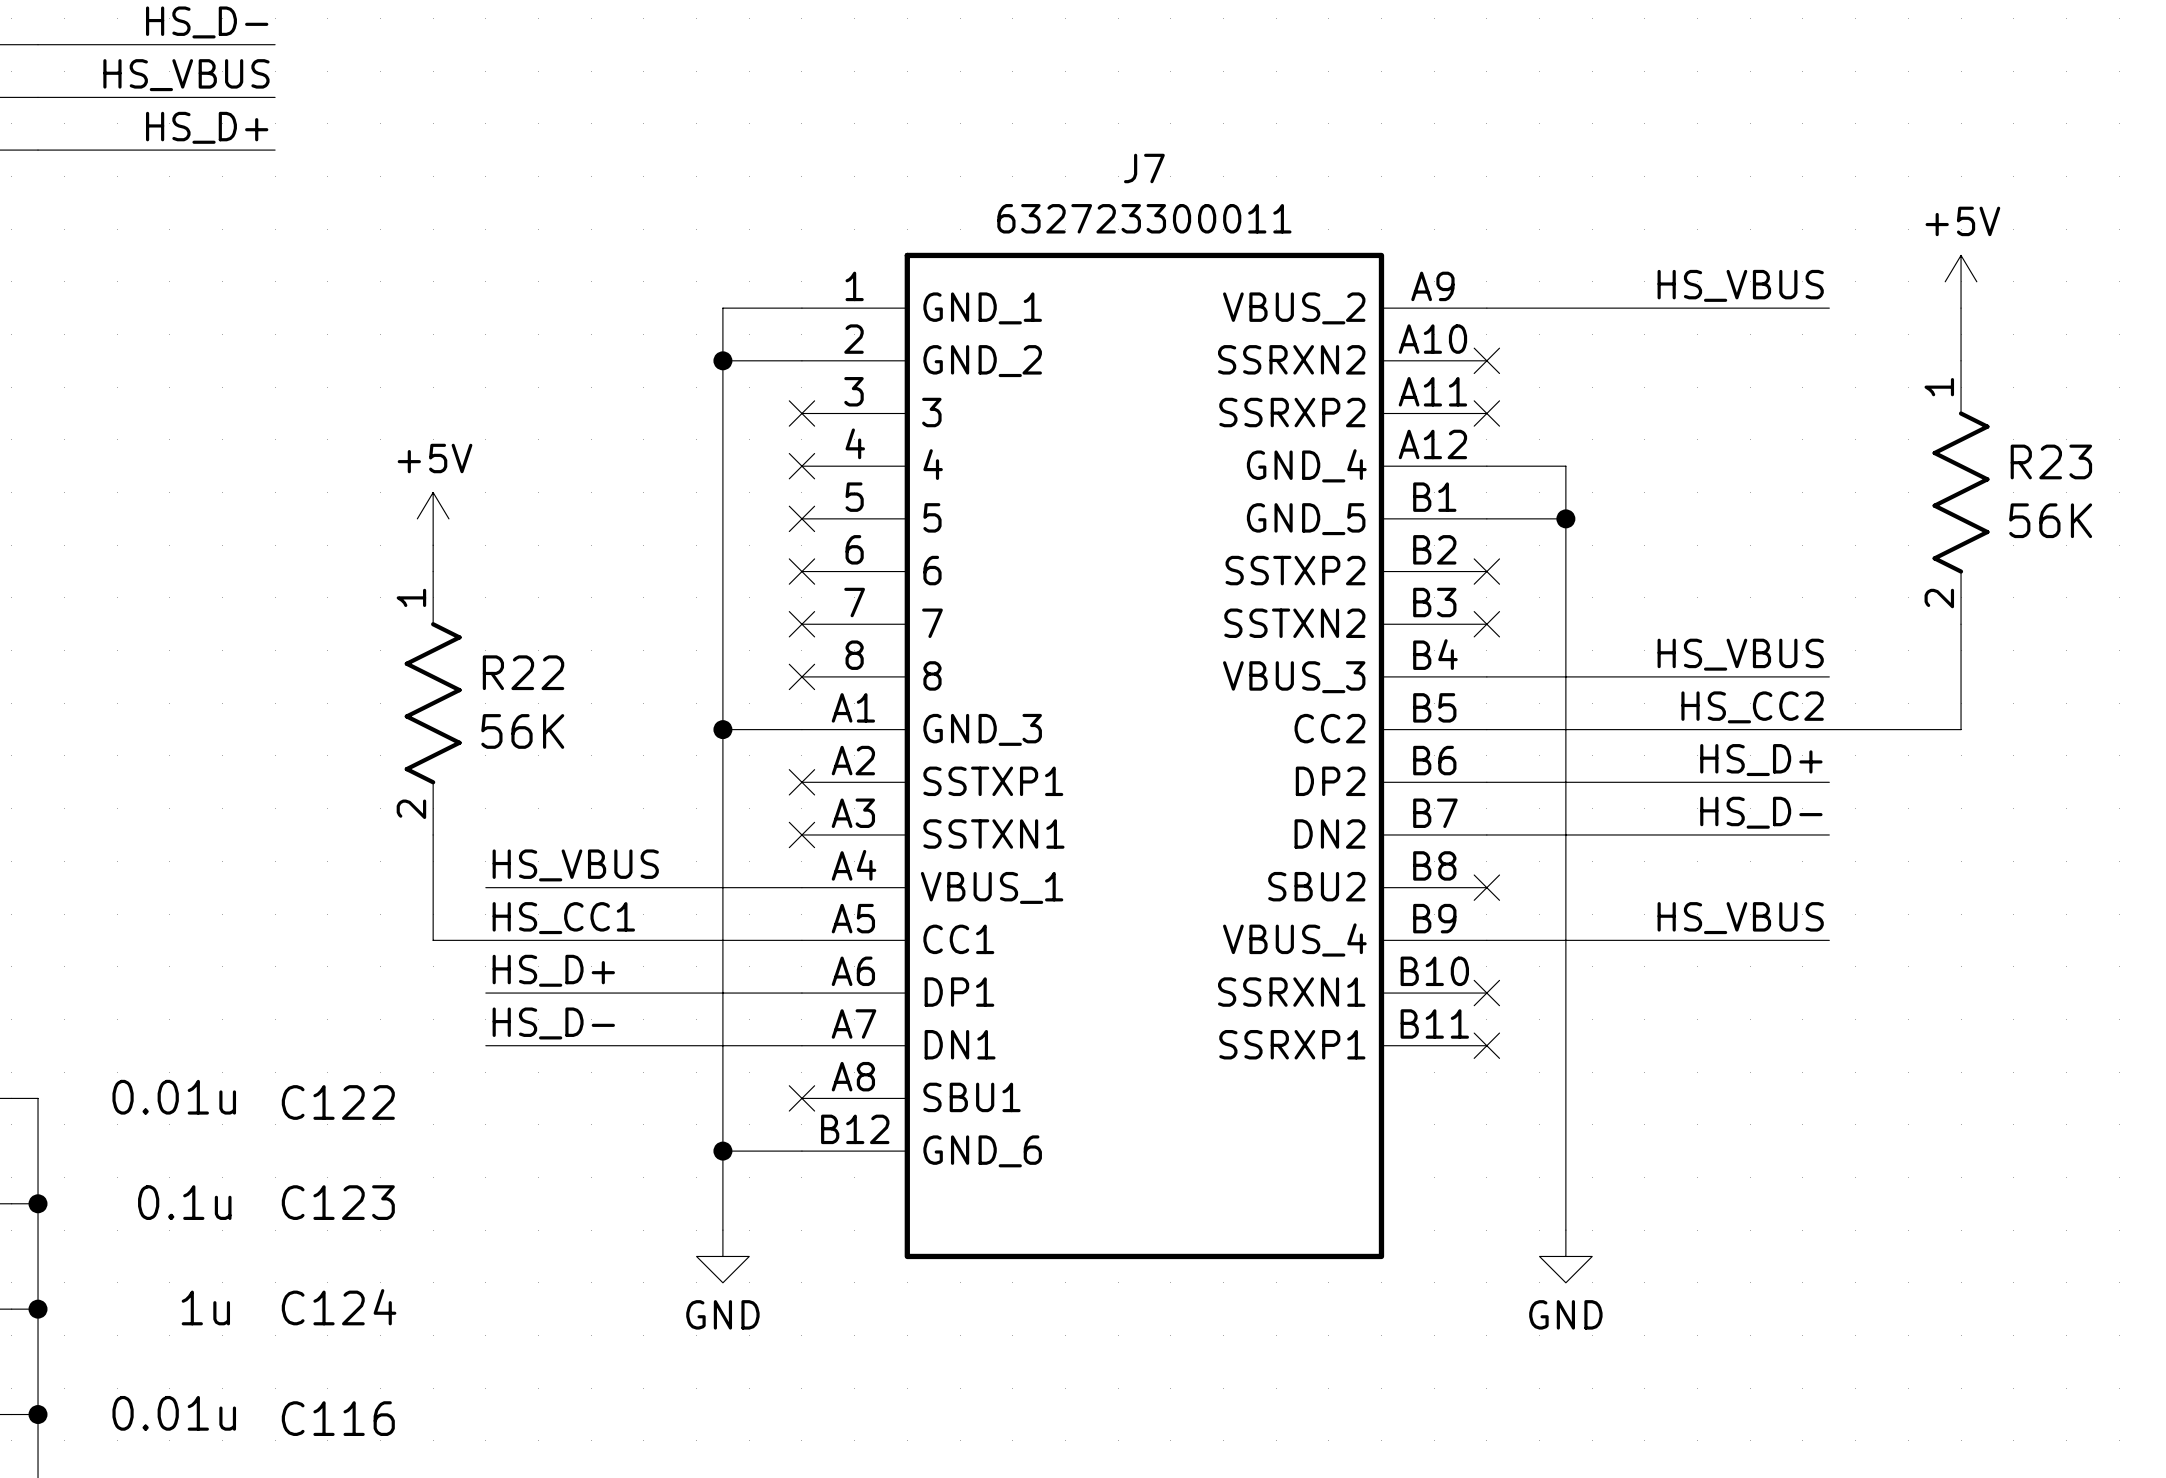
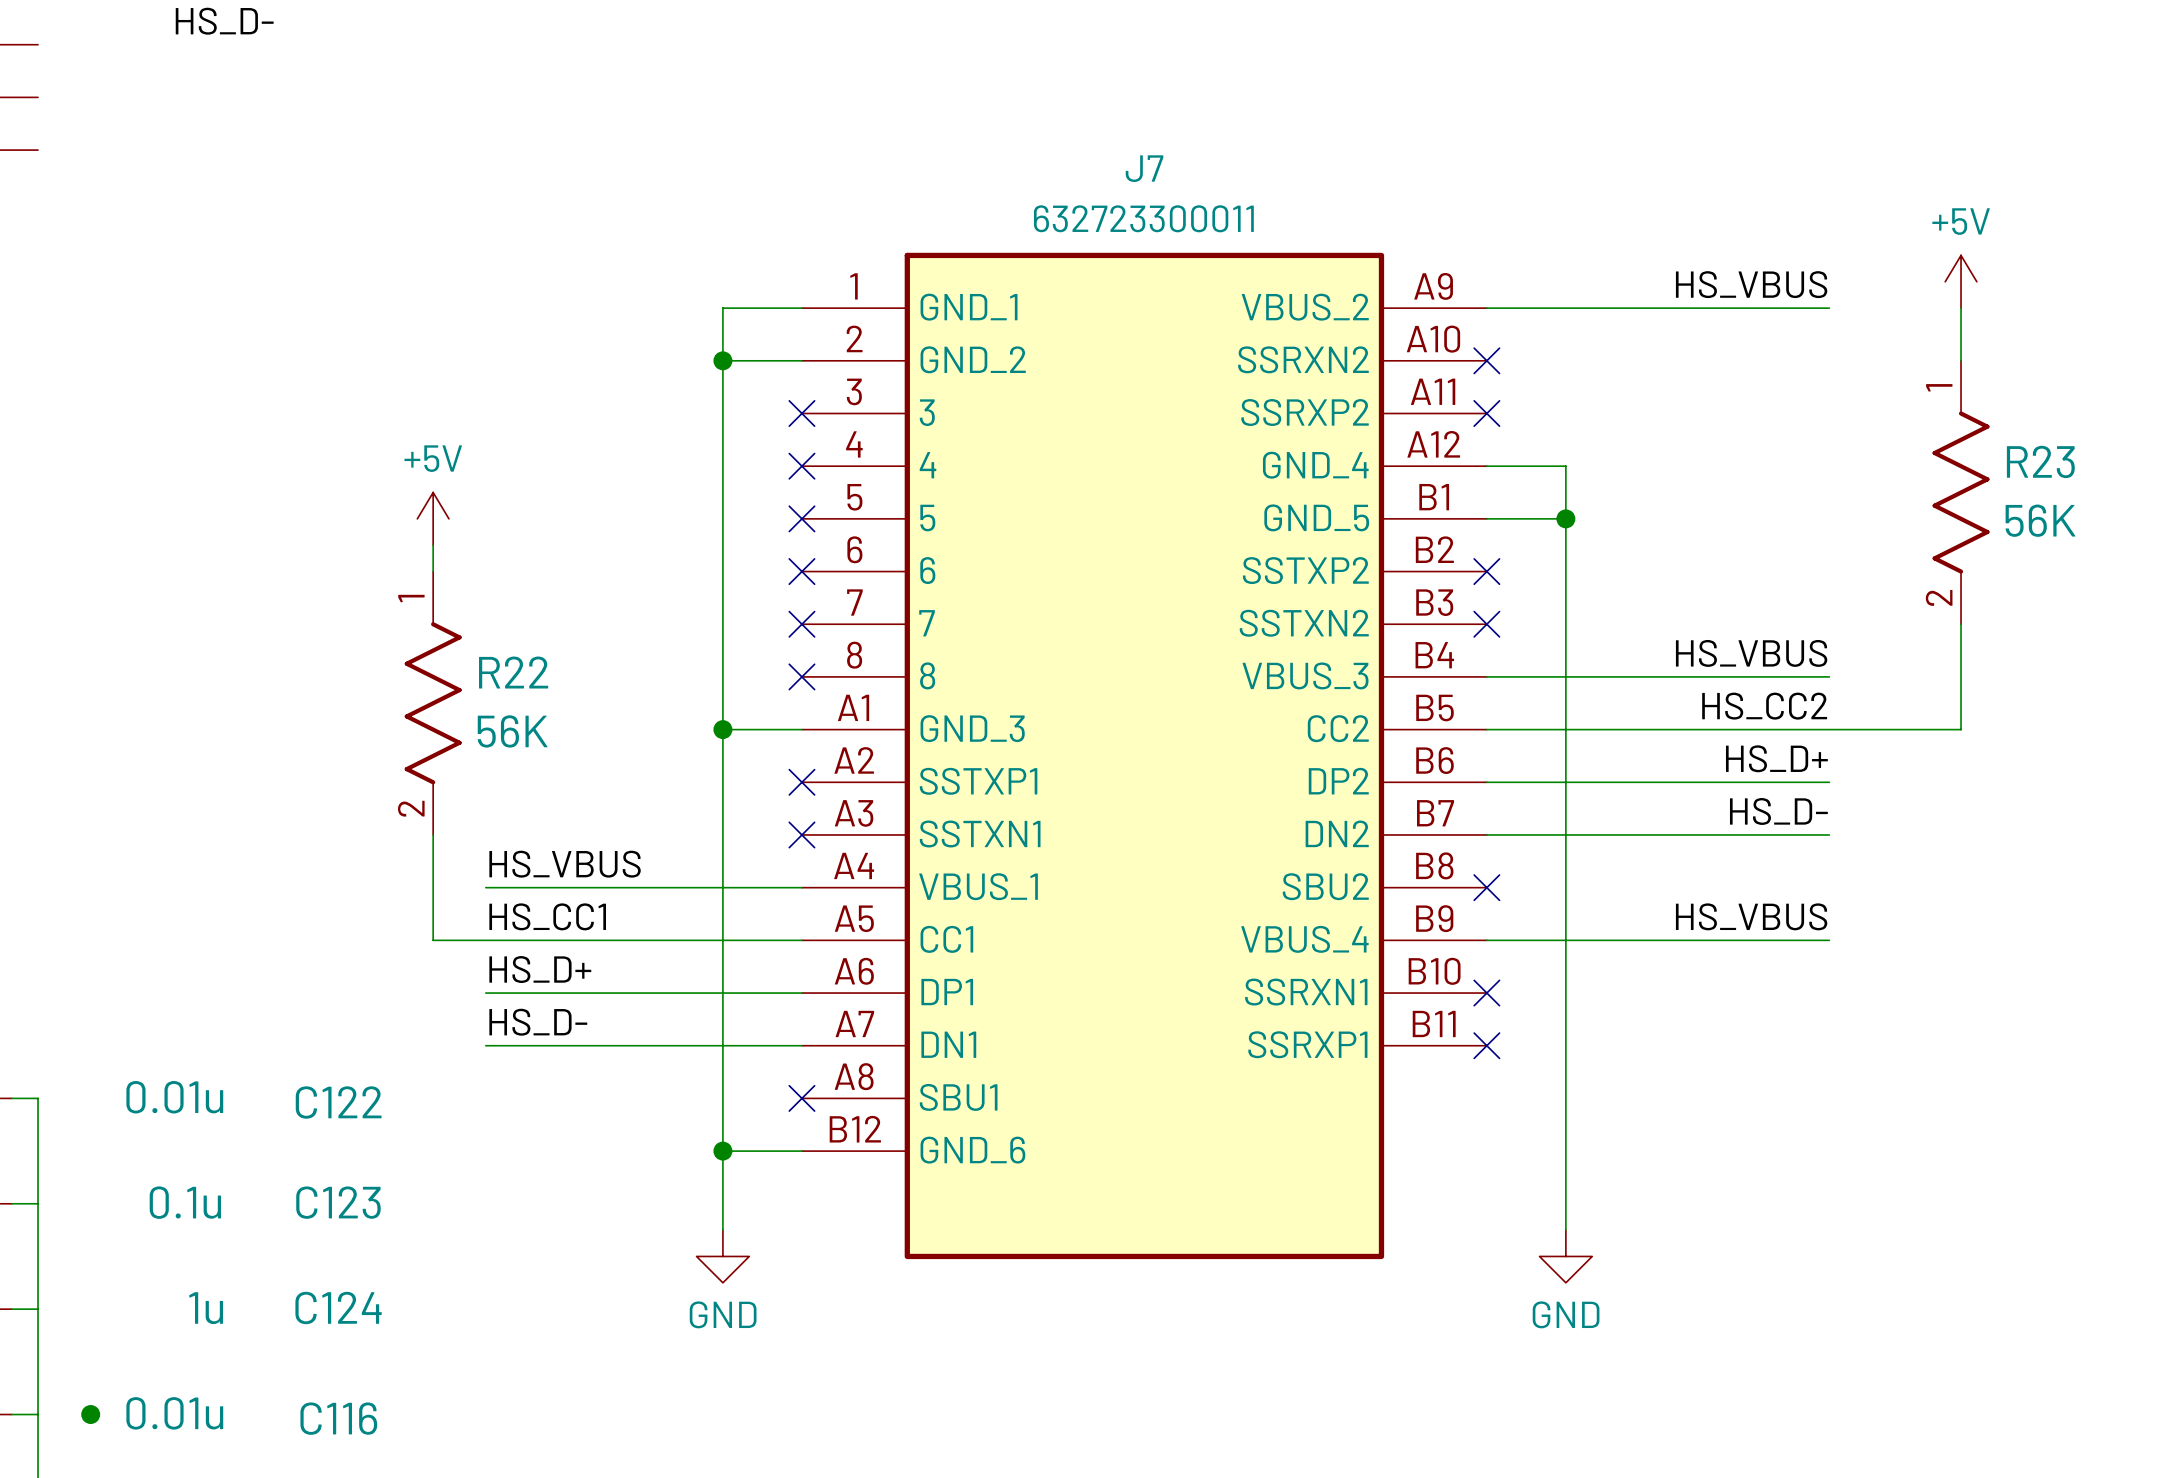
wire: (38, 44) (275, 44) -> none
label: HS_VBUS (186, 75) -> none
wire: (38, 97) (275, 97) -> none
label: HS_D+ (207, 127) -> none
wire: (38, 150) (275, 150) -> none
junction: (38, 1203) -> none
junction: (38, 1309) -> none
junction position: (38, 1414) -> (90, 1414)

